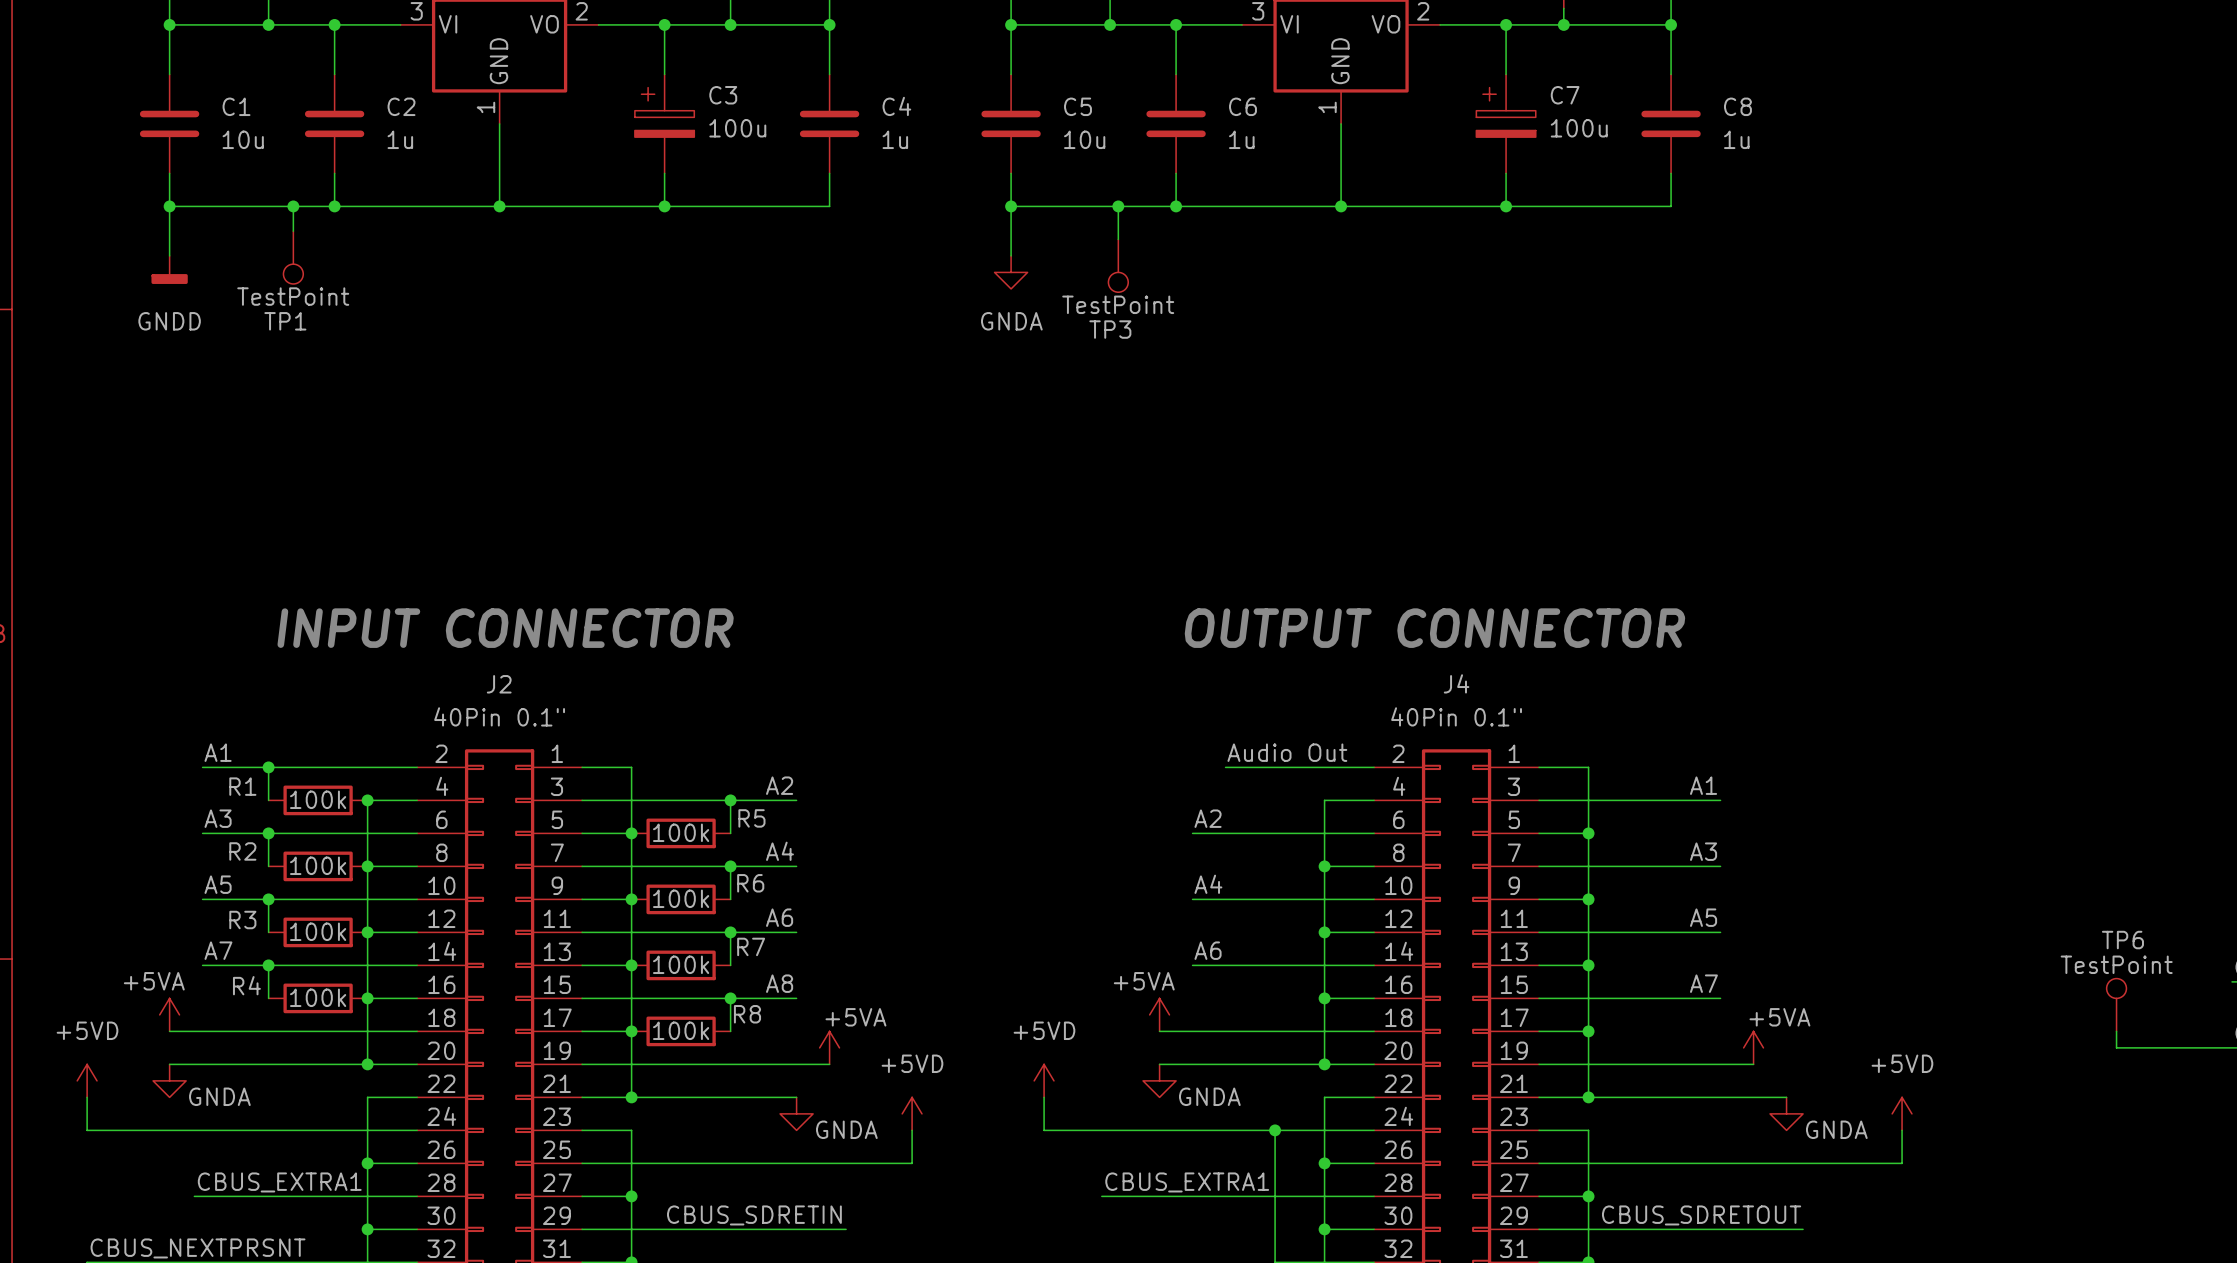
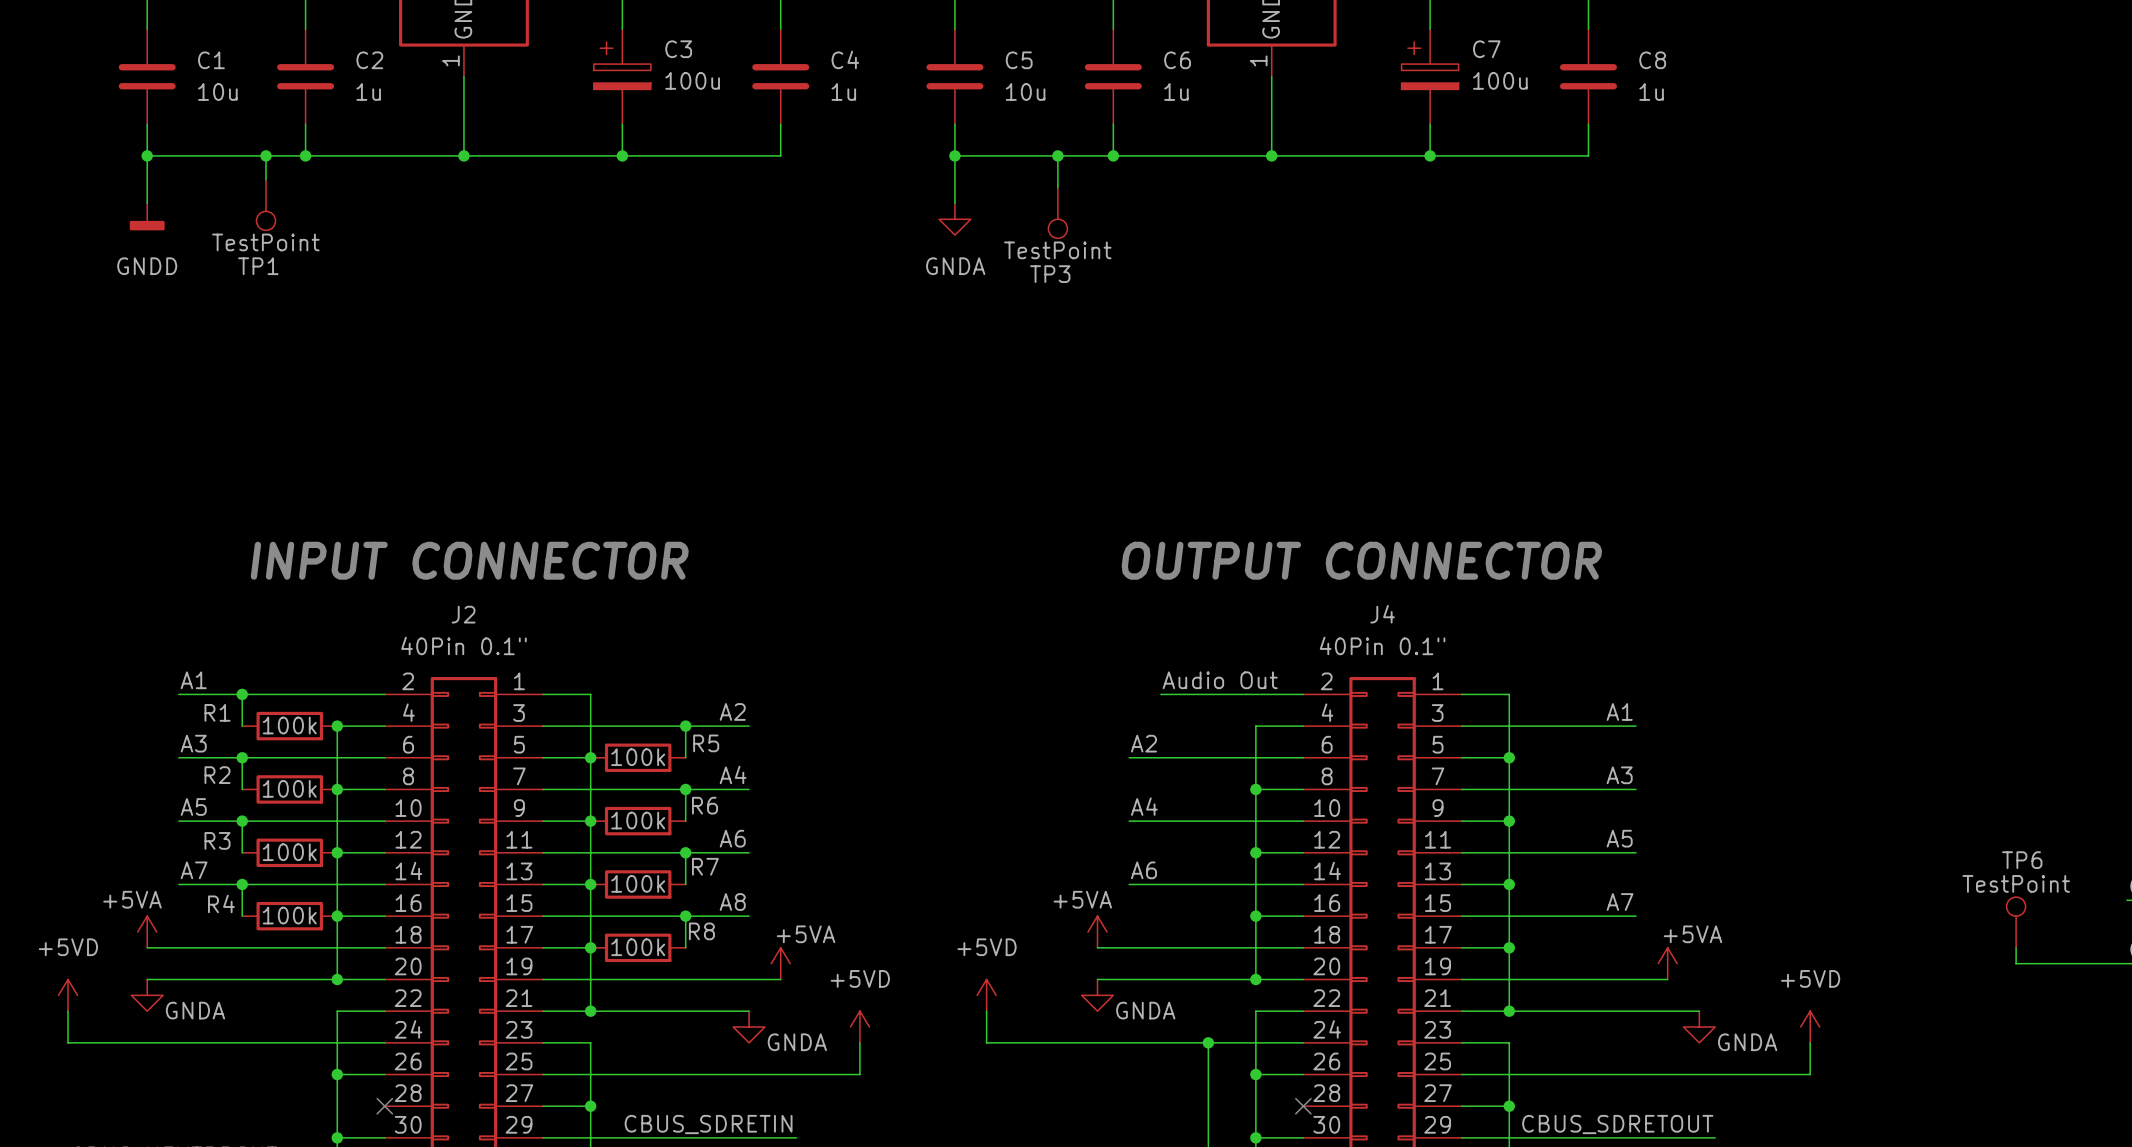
label: CBUS_EXTRA1 (279, 1182) -> none
label: CBUS_EXTRA1 (1187, 1182) -> none
wire: (194, 1196) (417, 1196) -> none
no-connect mark: none -> (384, 1106)
wire: (1101, 1196) (1374, 1196) -> none
no-connect mark: none -> (1303, 1106)

